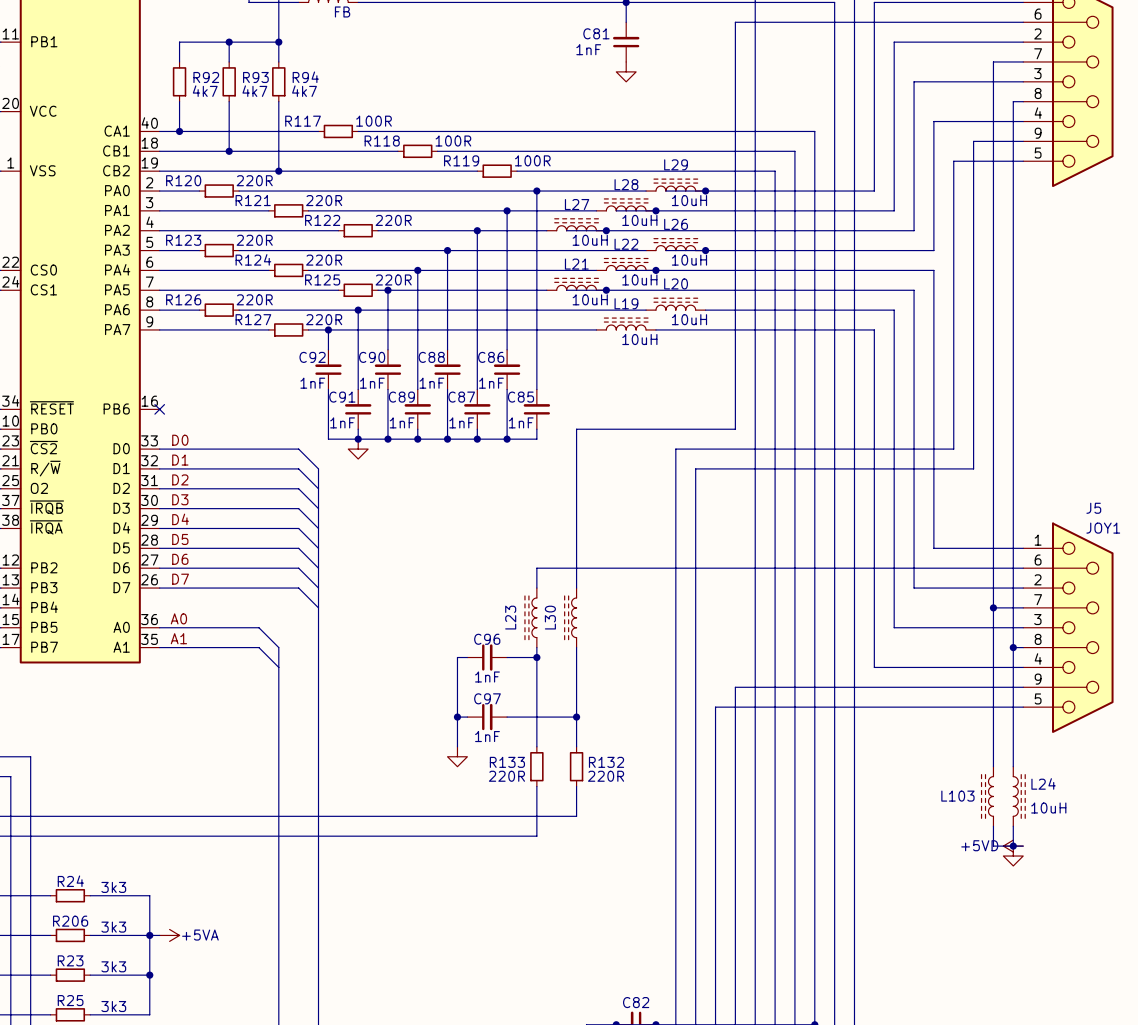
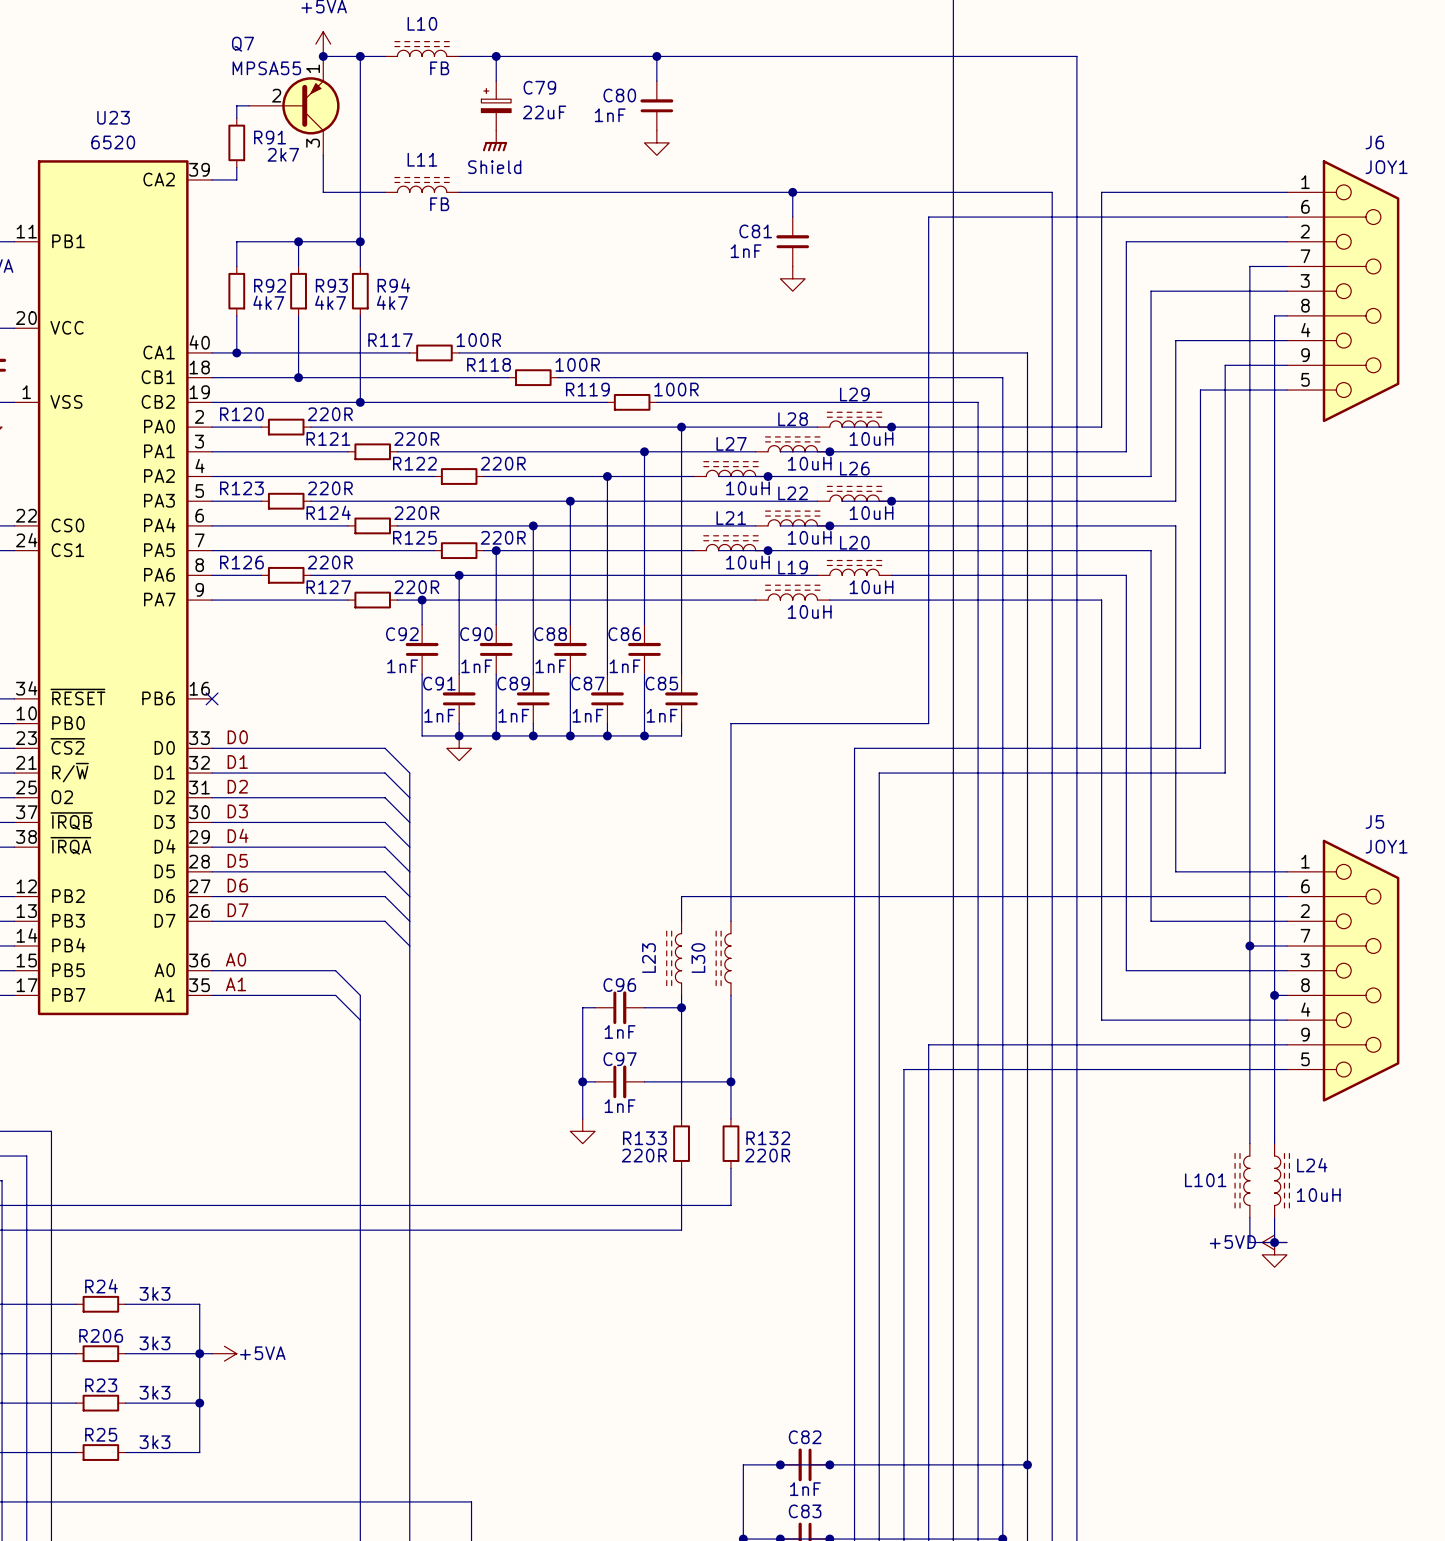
L103 name: L103 (957, 796) -> L101 (1205, 1180)

